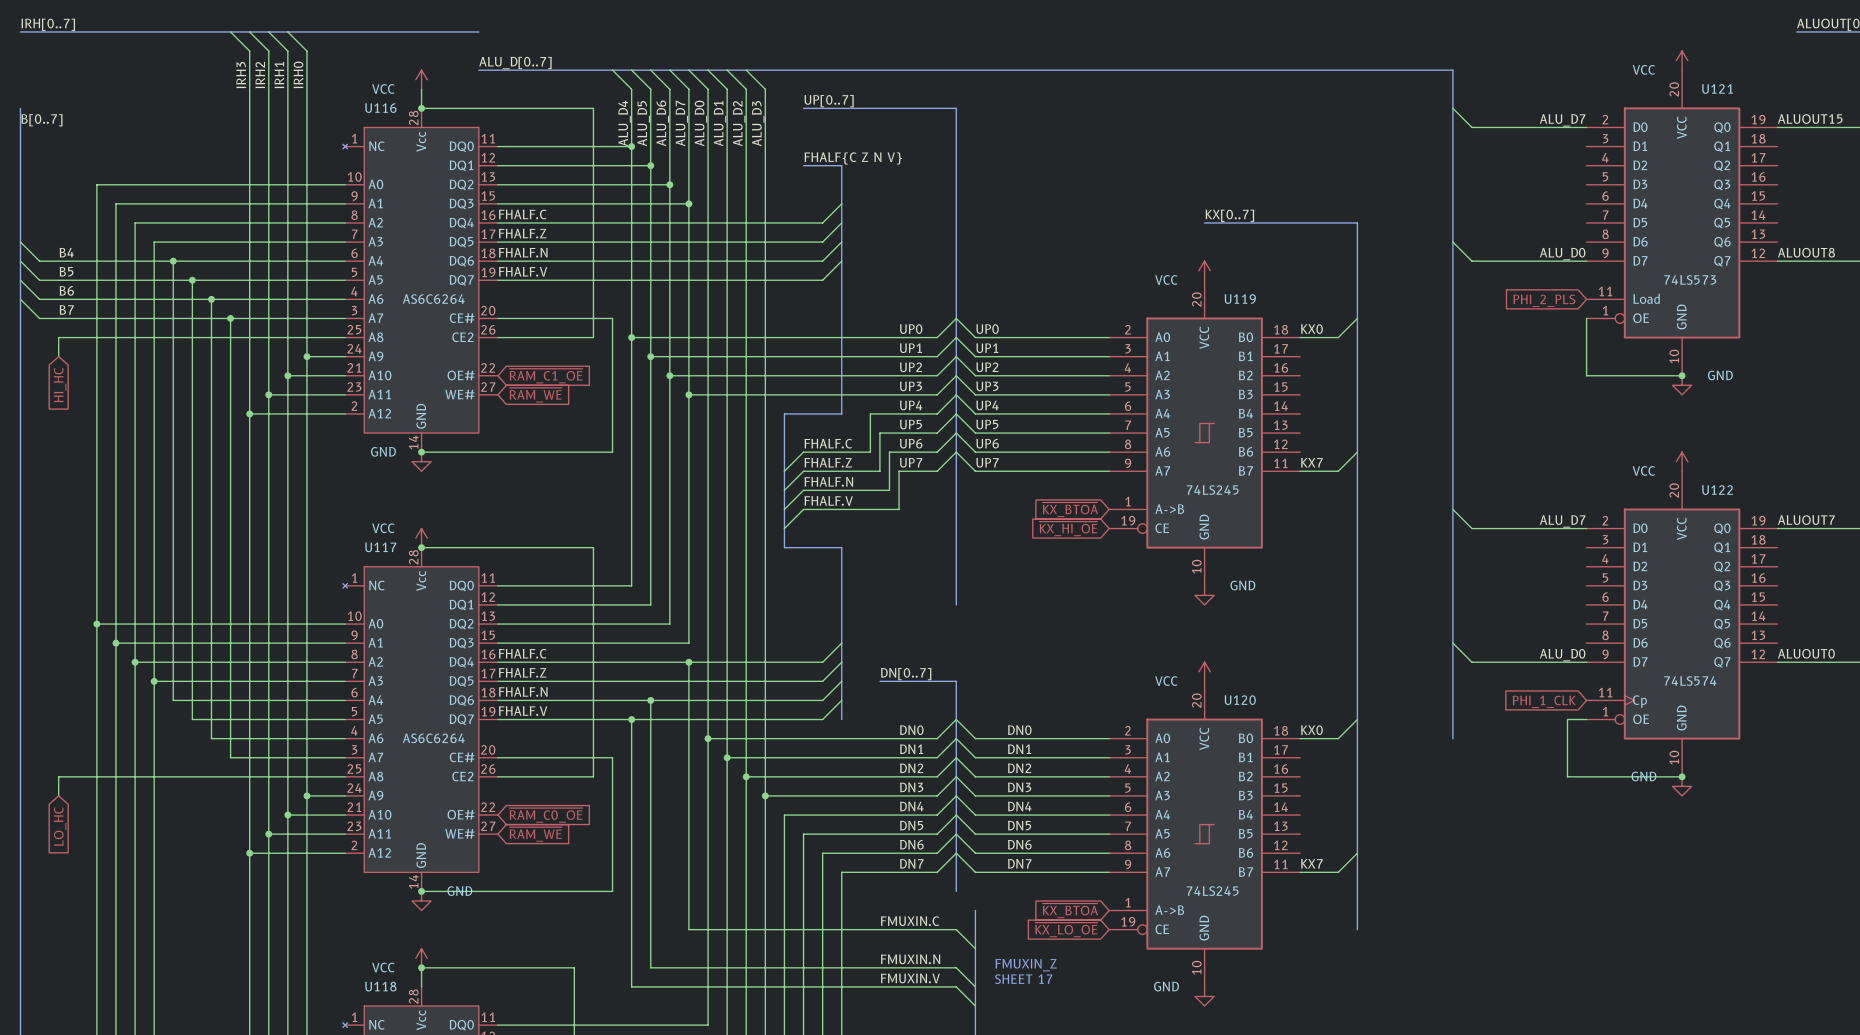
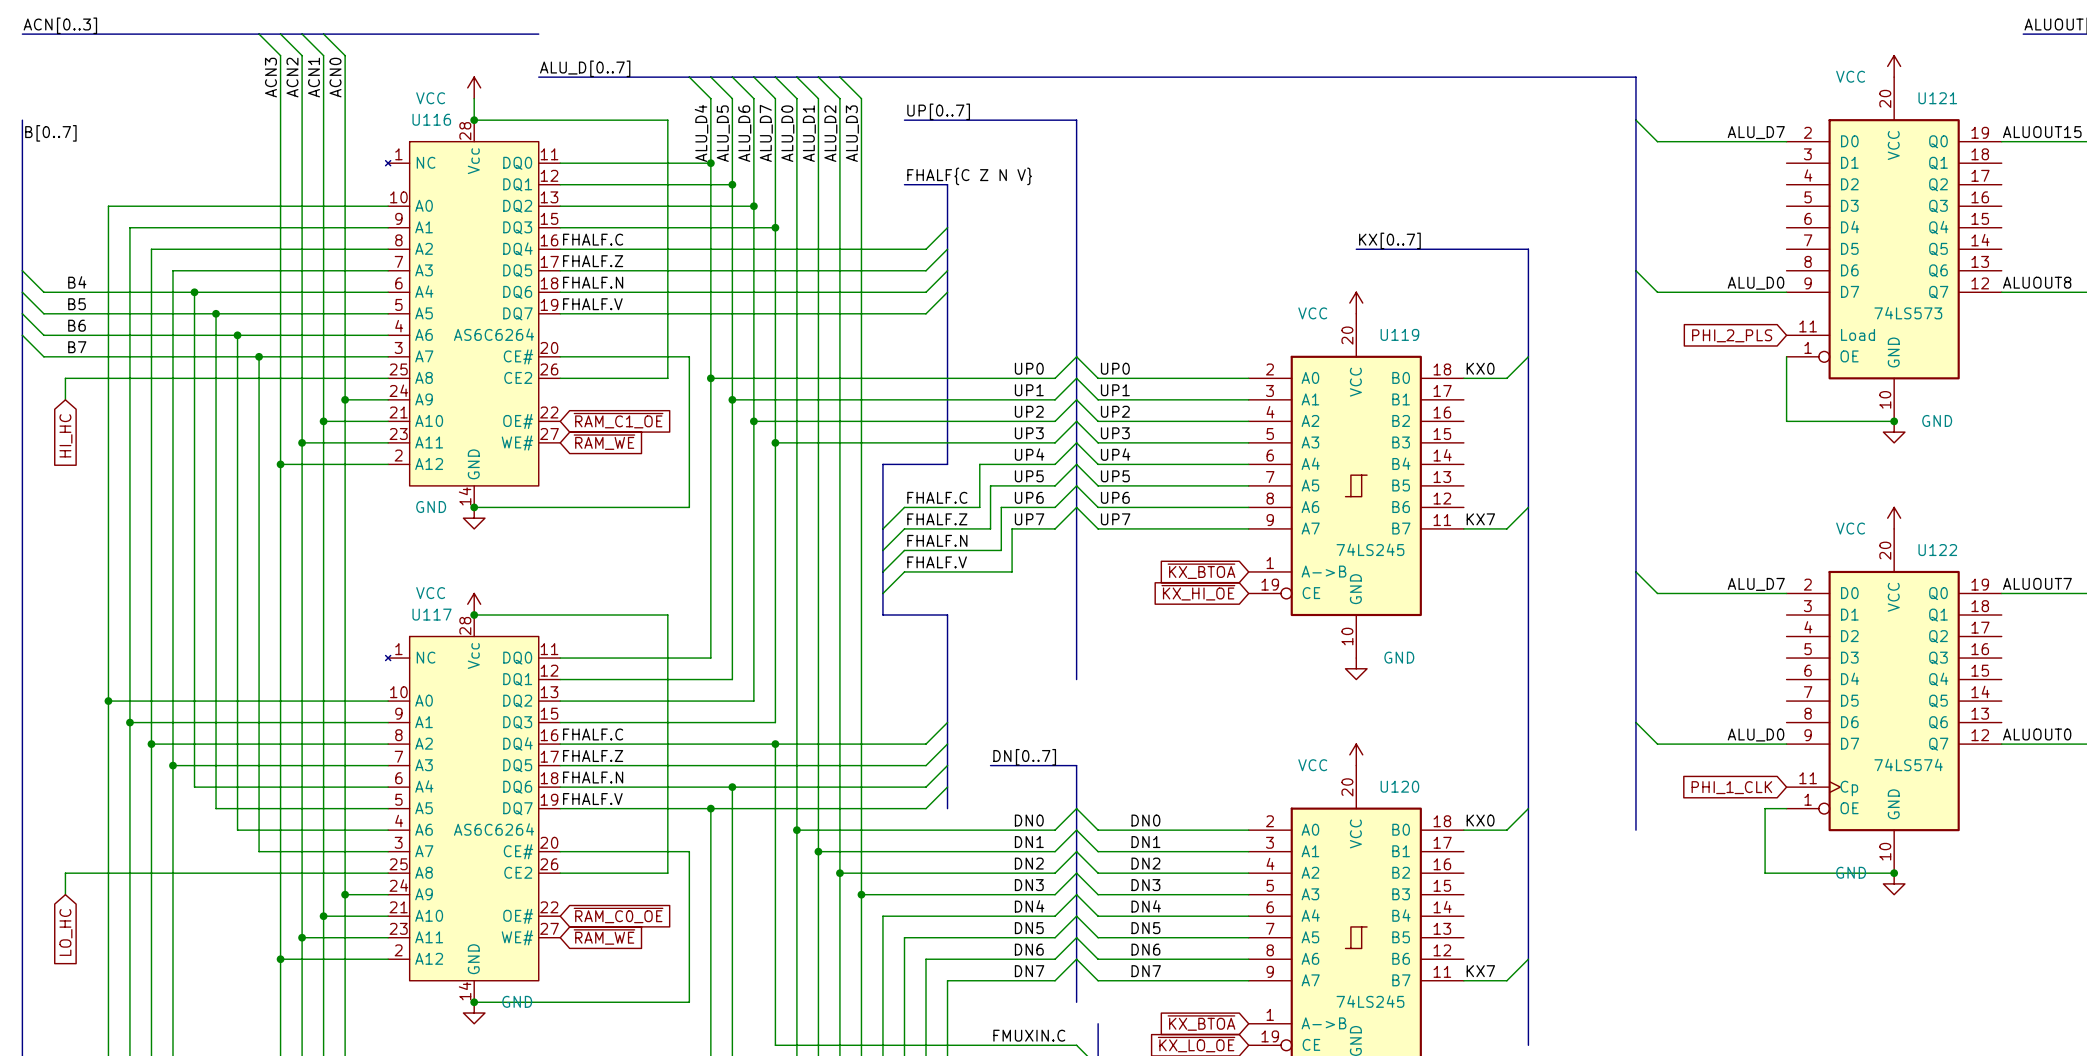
label: IRH[0..7] (48, 24) -> ACN[0..3] (60, 25)
label: IRH0 (298, 74) -> ACN0 (335, 77)
label: IRH3 (241, 75) -> ACN3 (270, 77)
label: IRH2 (260, 75) -> ACN2 (292, 77)
label: IRH1 (279, 75) -> ACN1 (313, 77)

